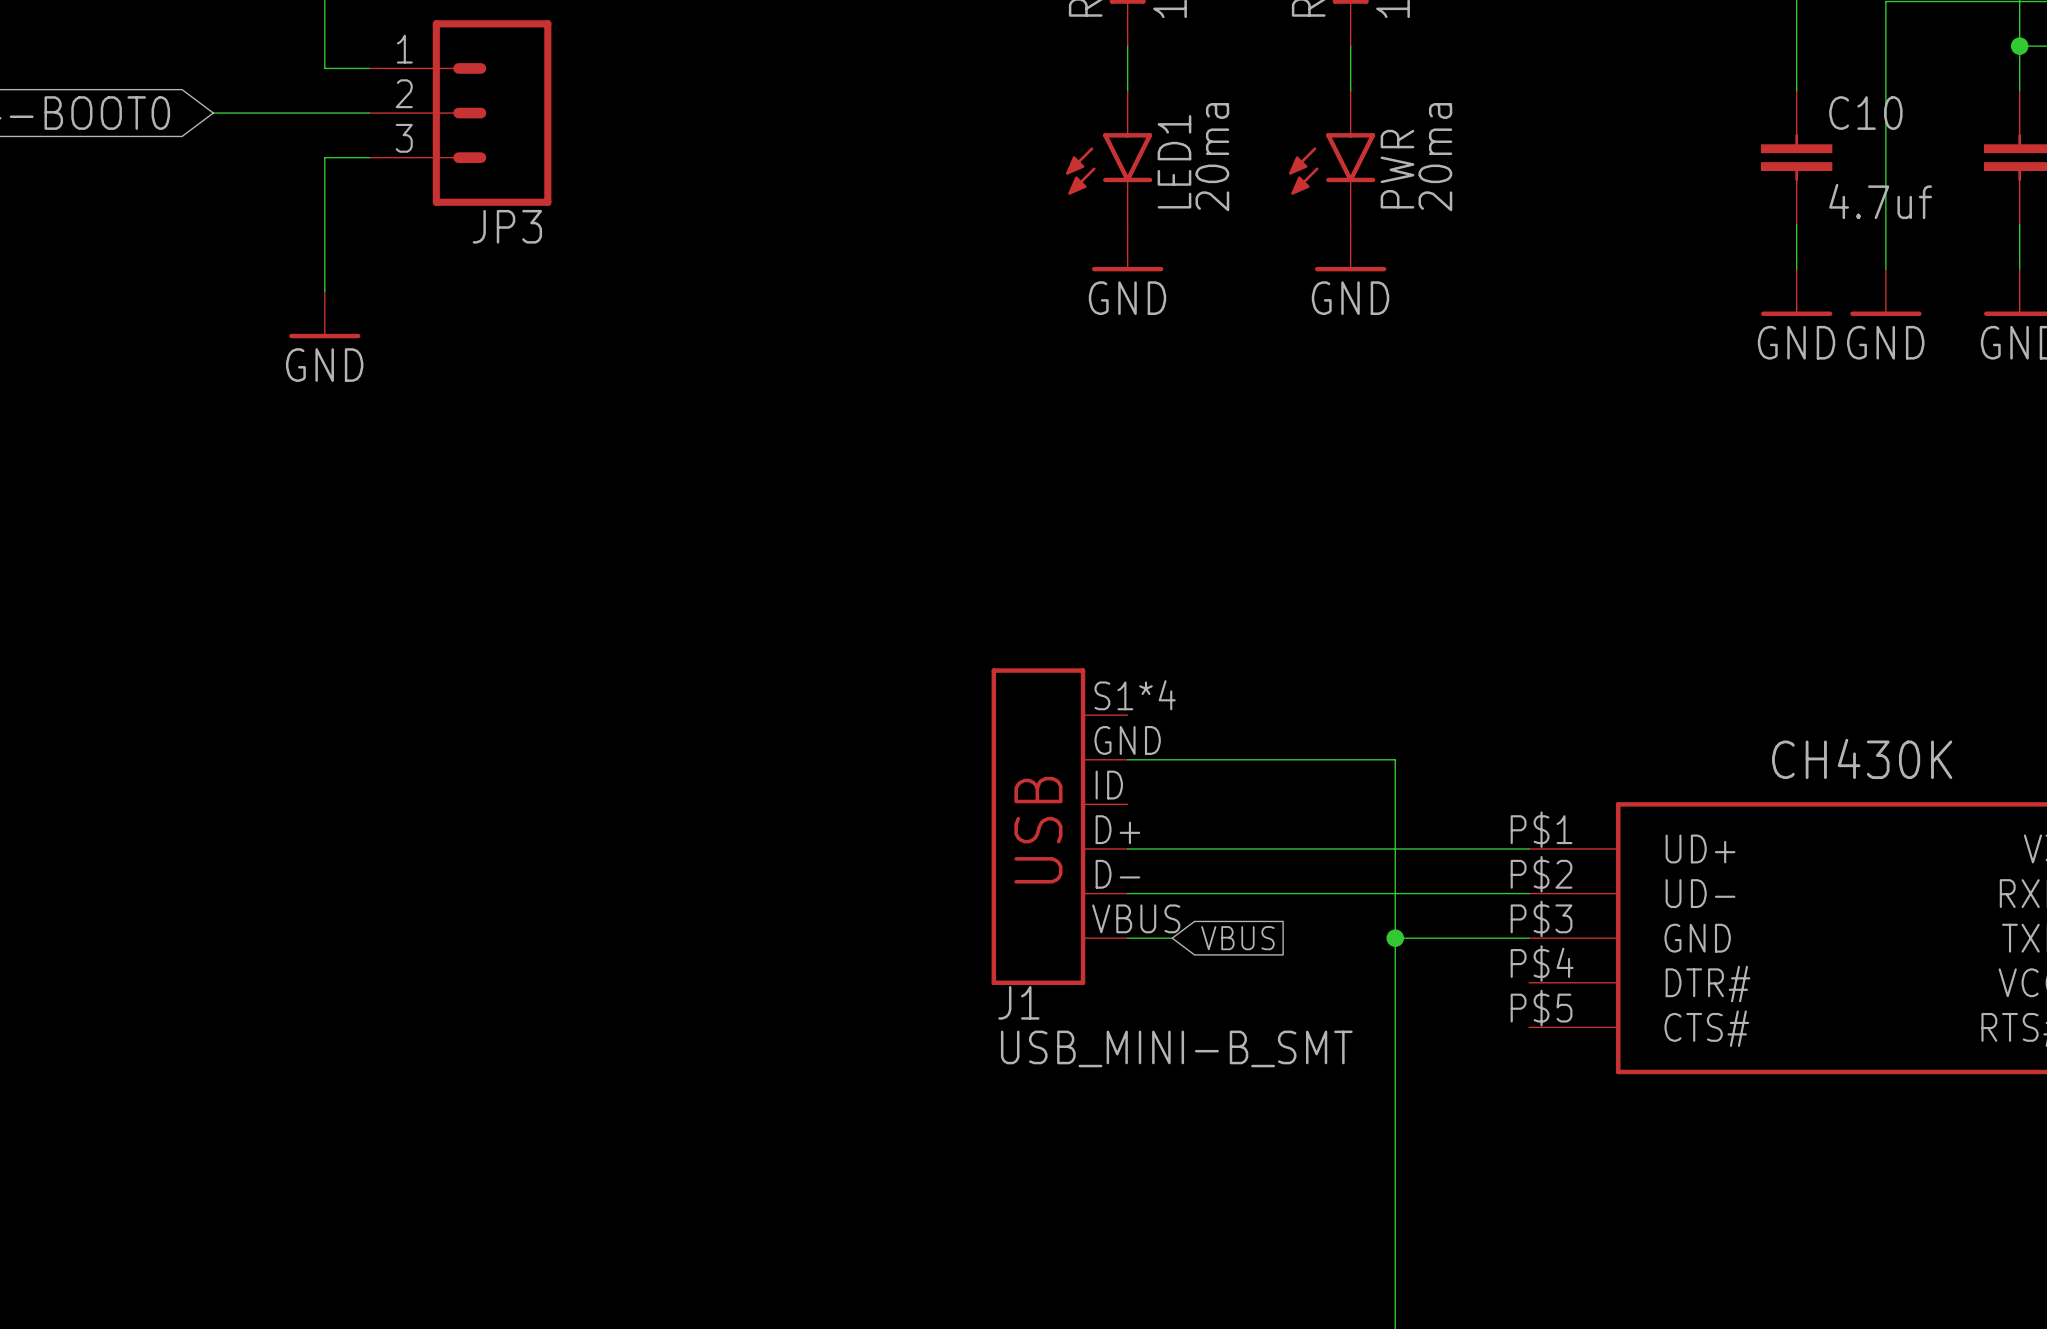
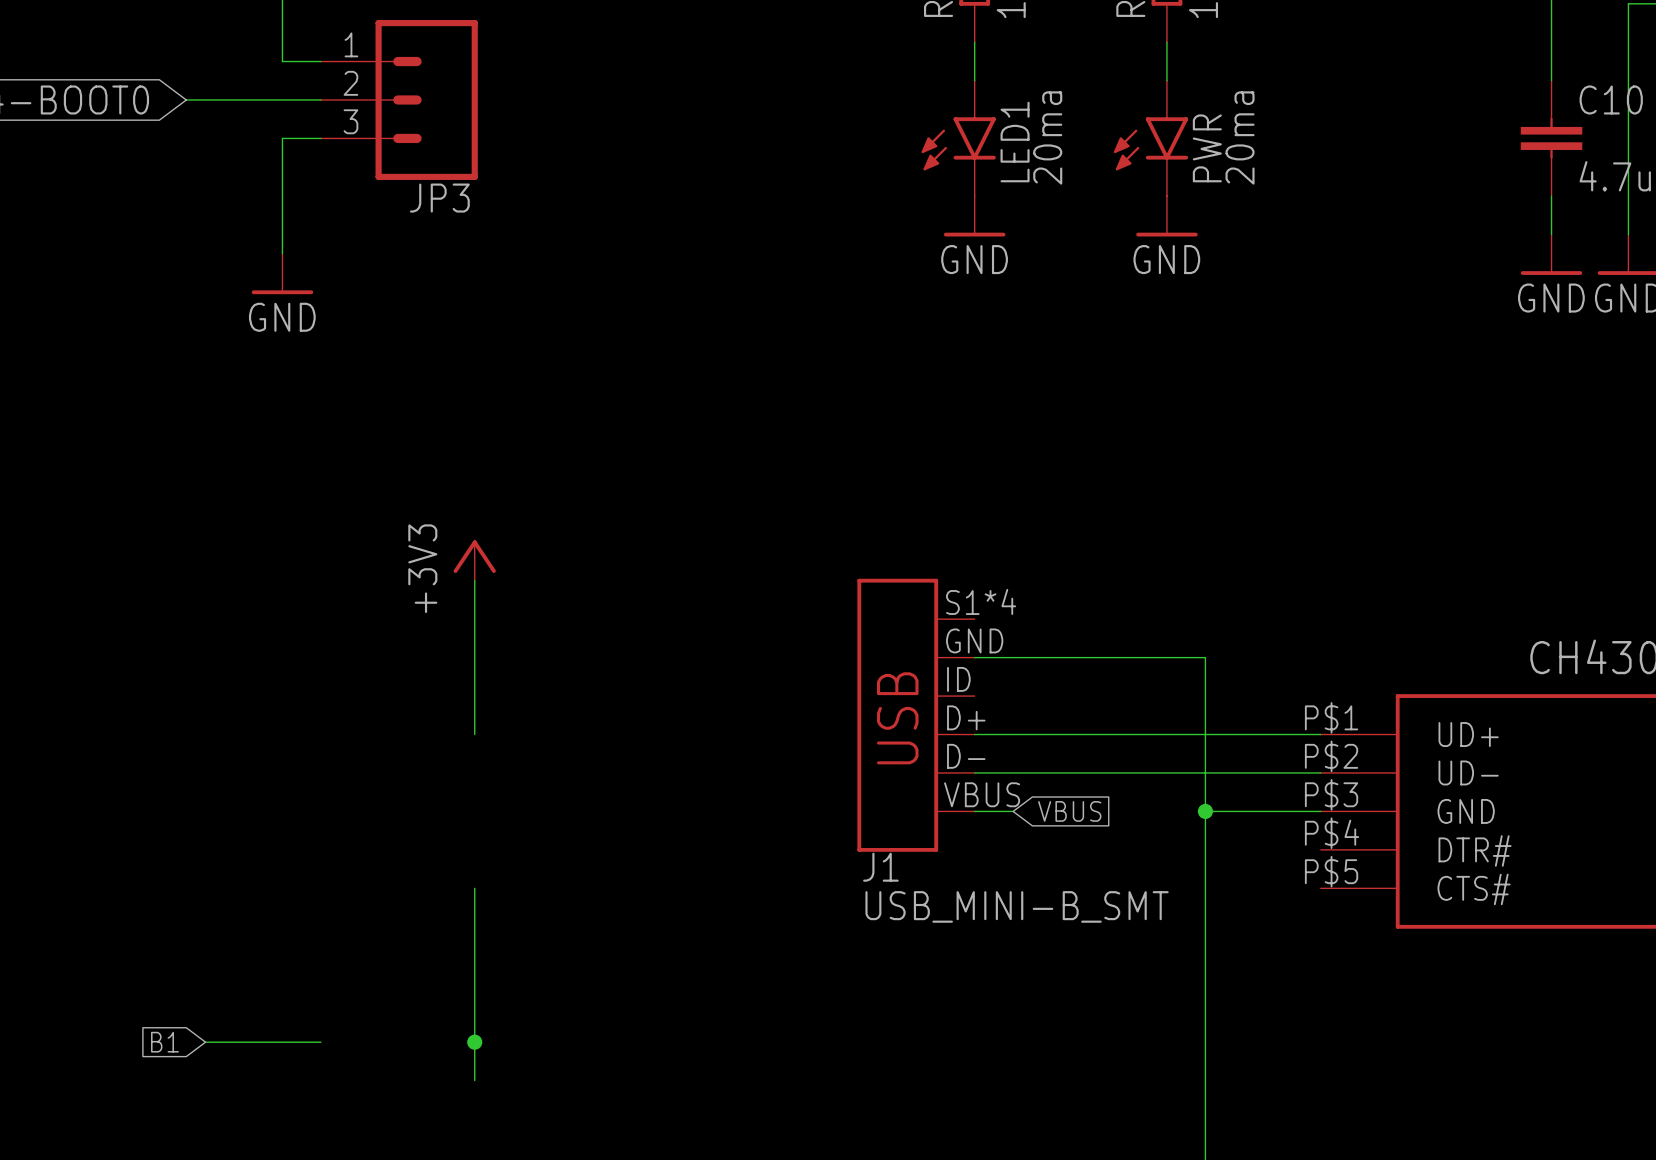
power symbol: none -> +3V3 (474, 560)
wire: none -> (474, 580) (474, 734)
wire: none -> (474, 888) (474, 1080)
global label: none -> B1 (164, 1042)
wire: none -> (205, 1042) (320, 1042)
junction: none -> (474, 1042)

